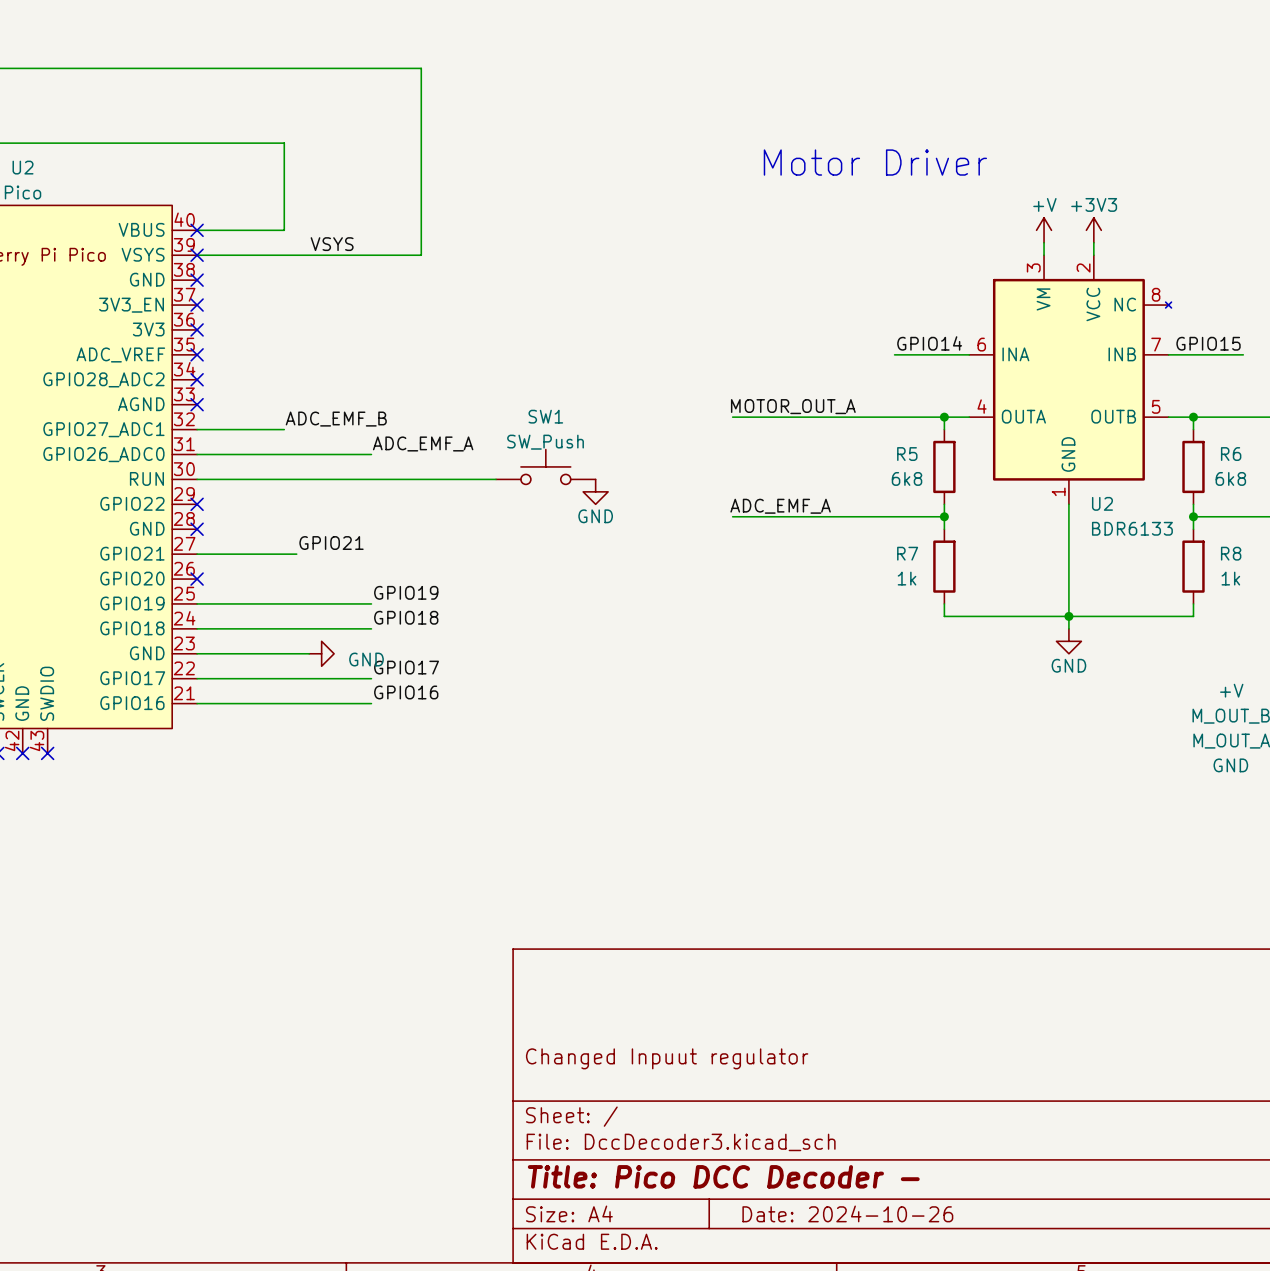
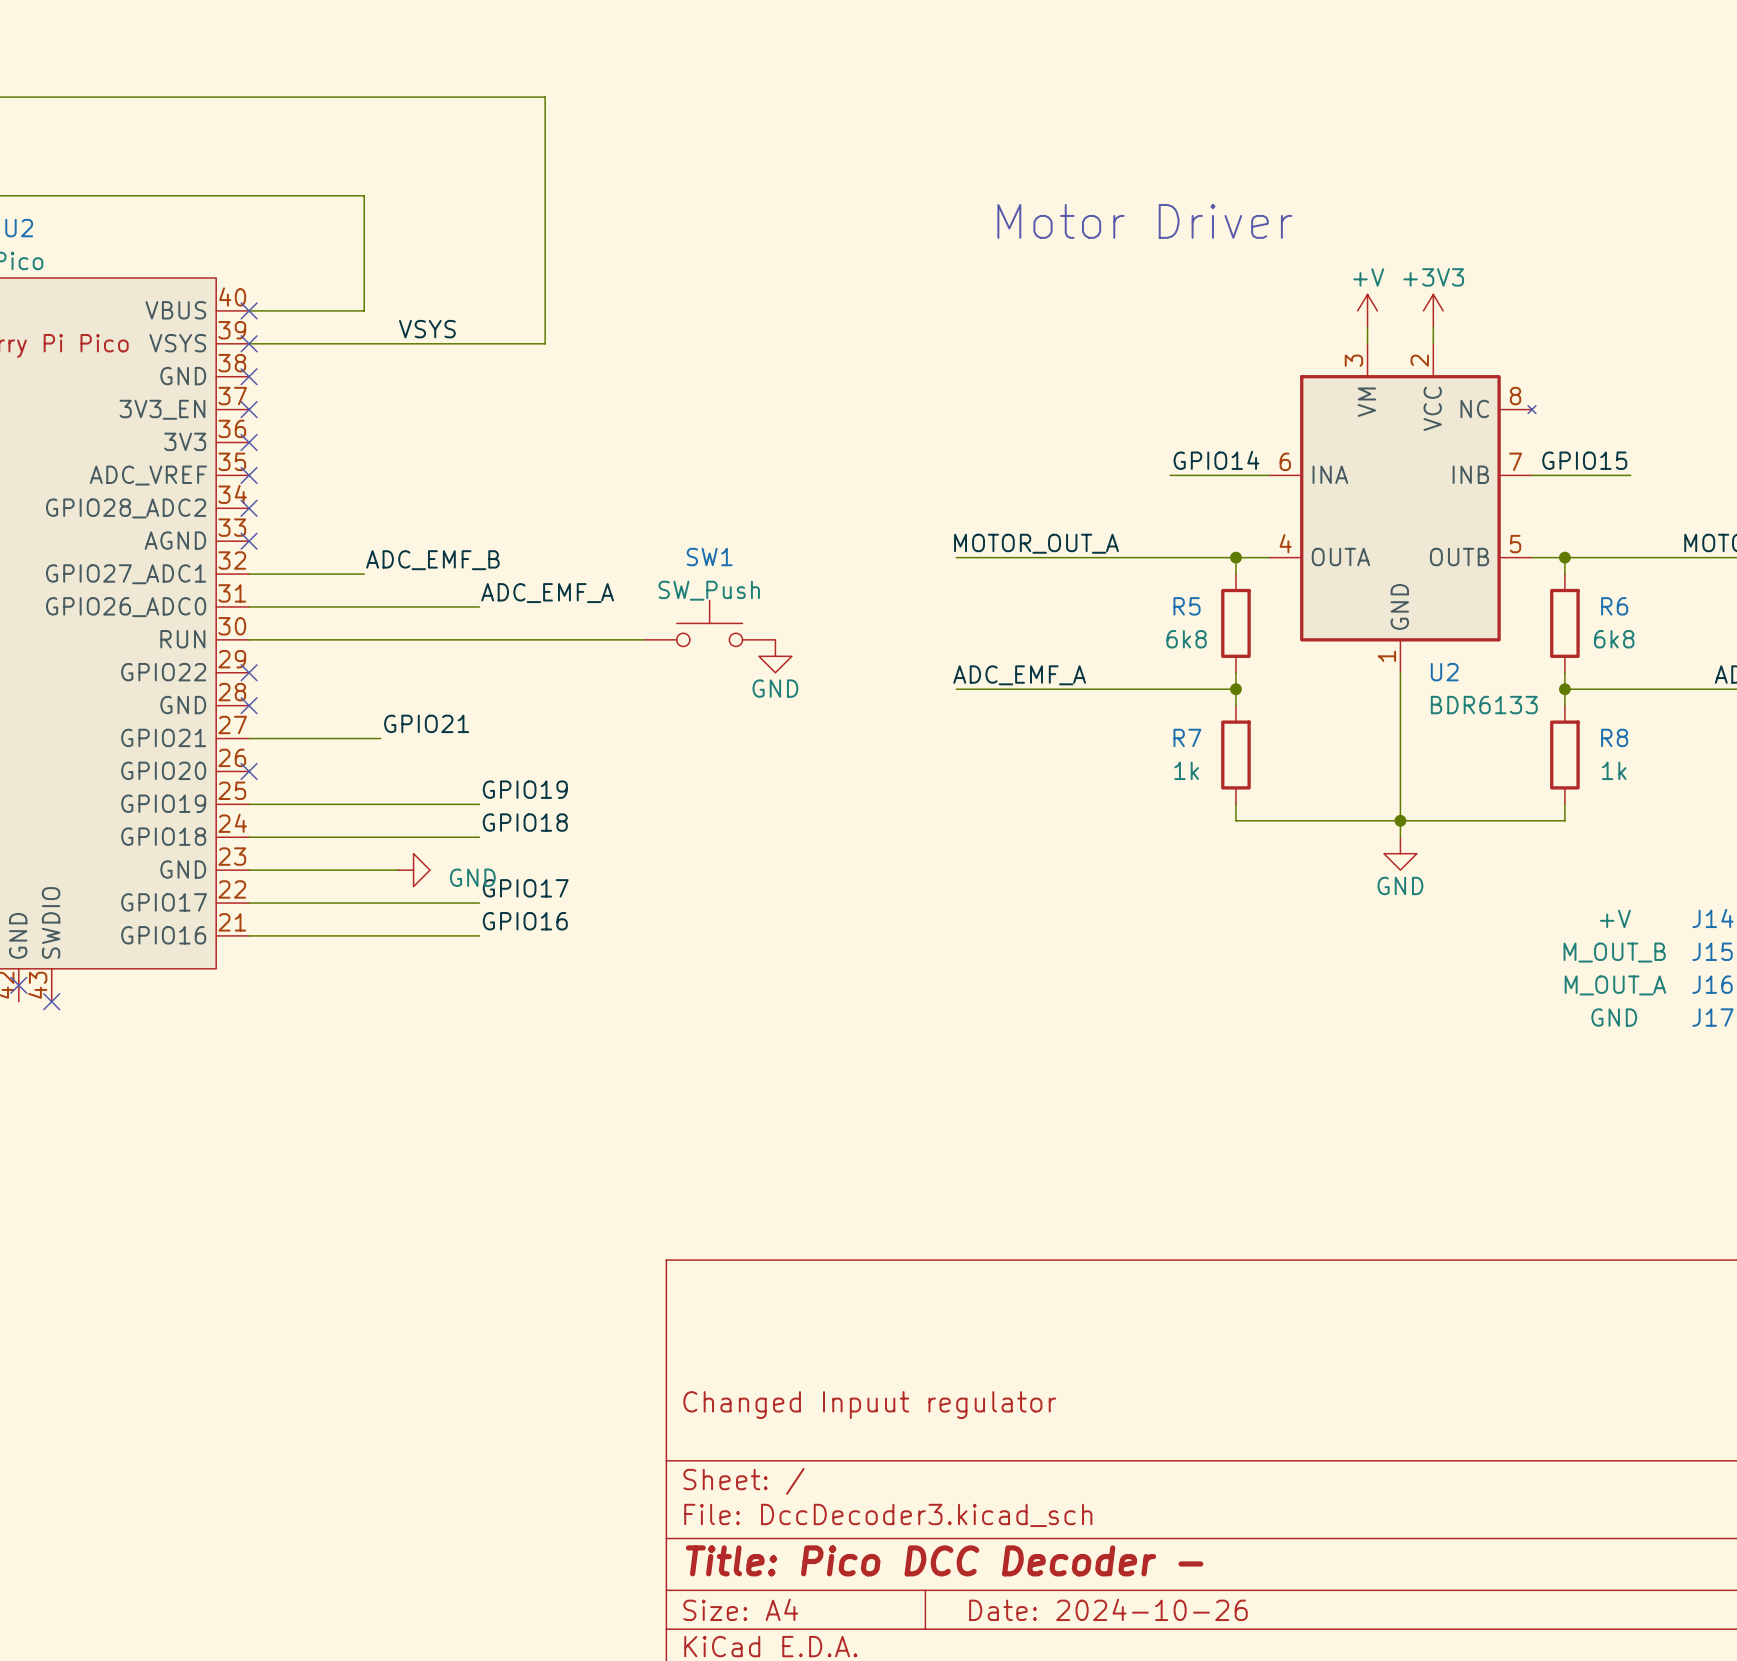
no-connect mark position: (22, 753) -> (18, 985)

